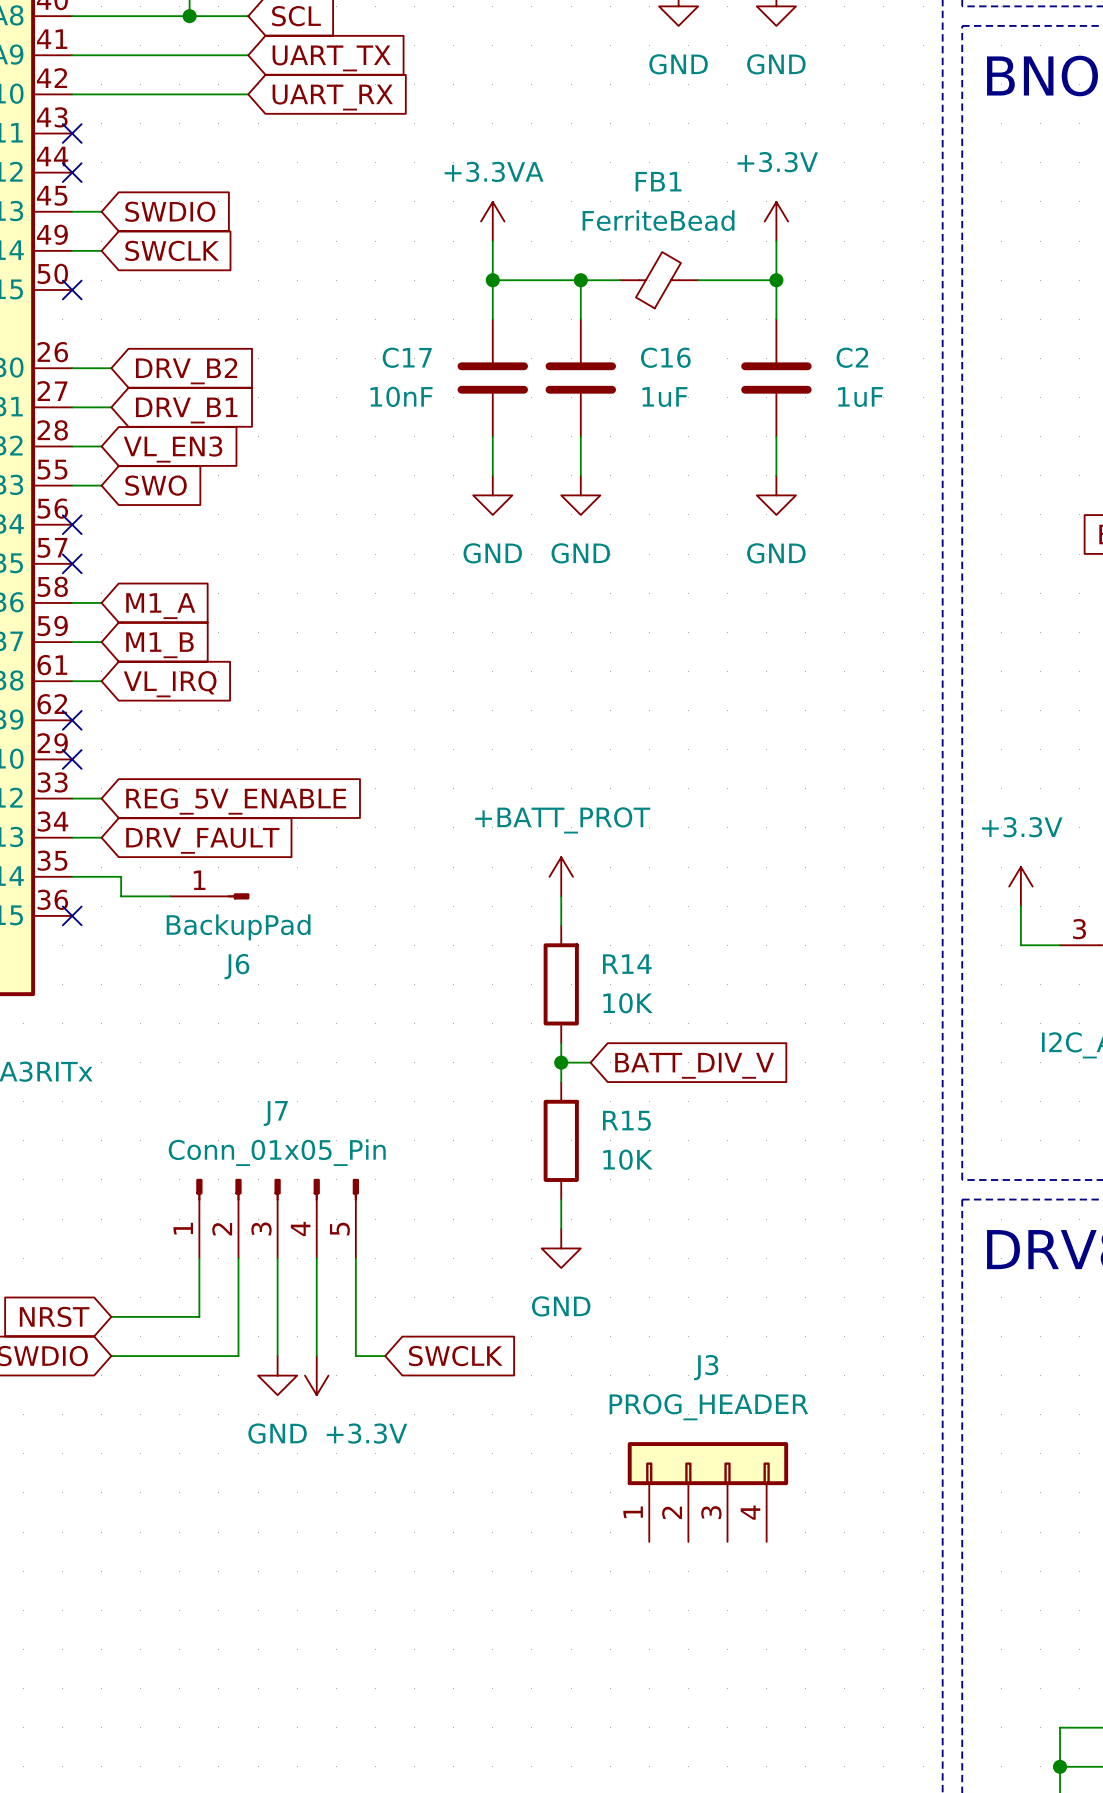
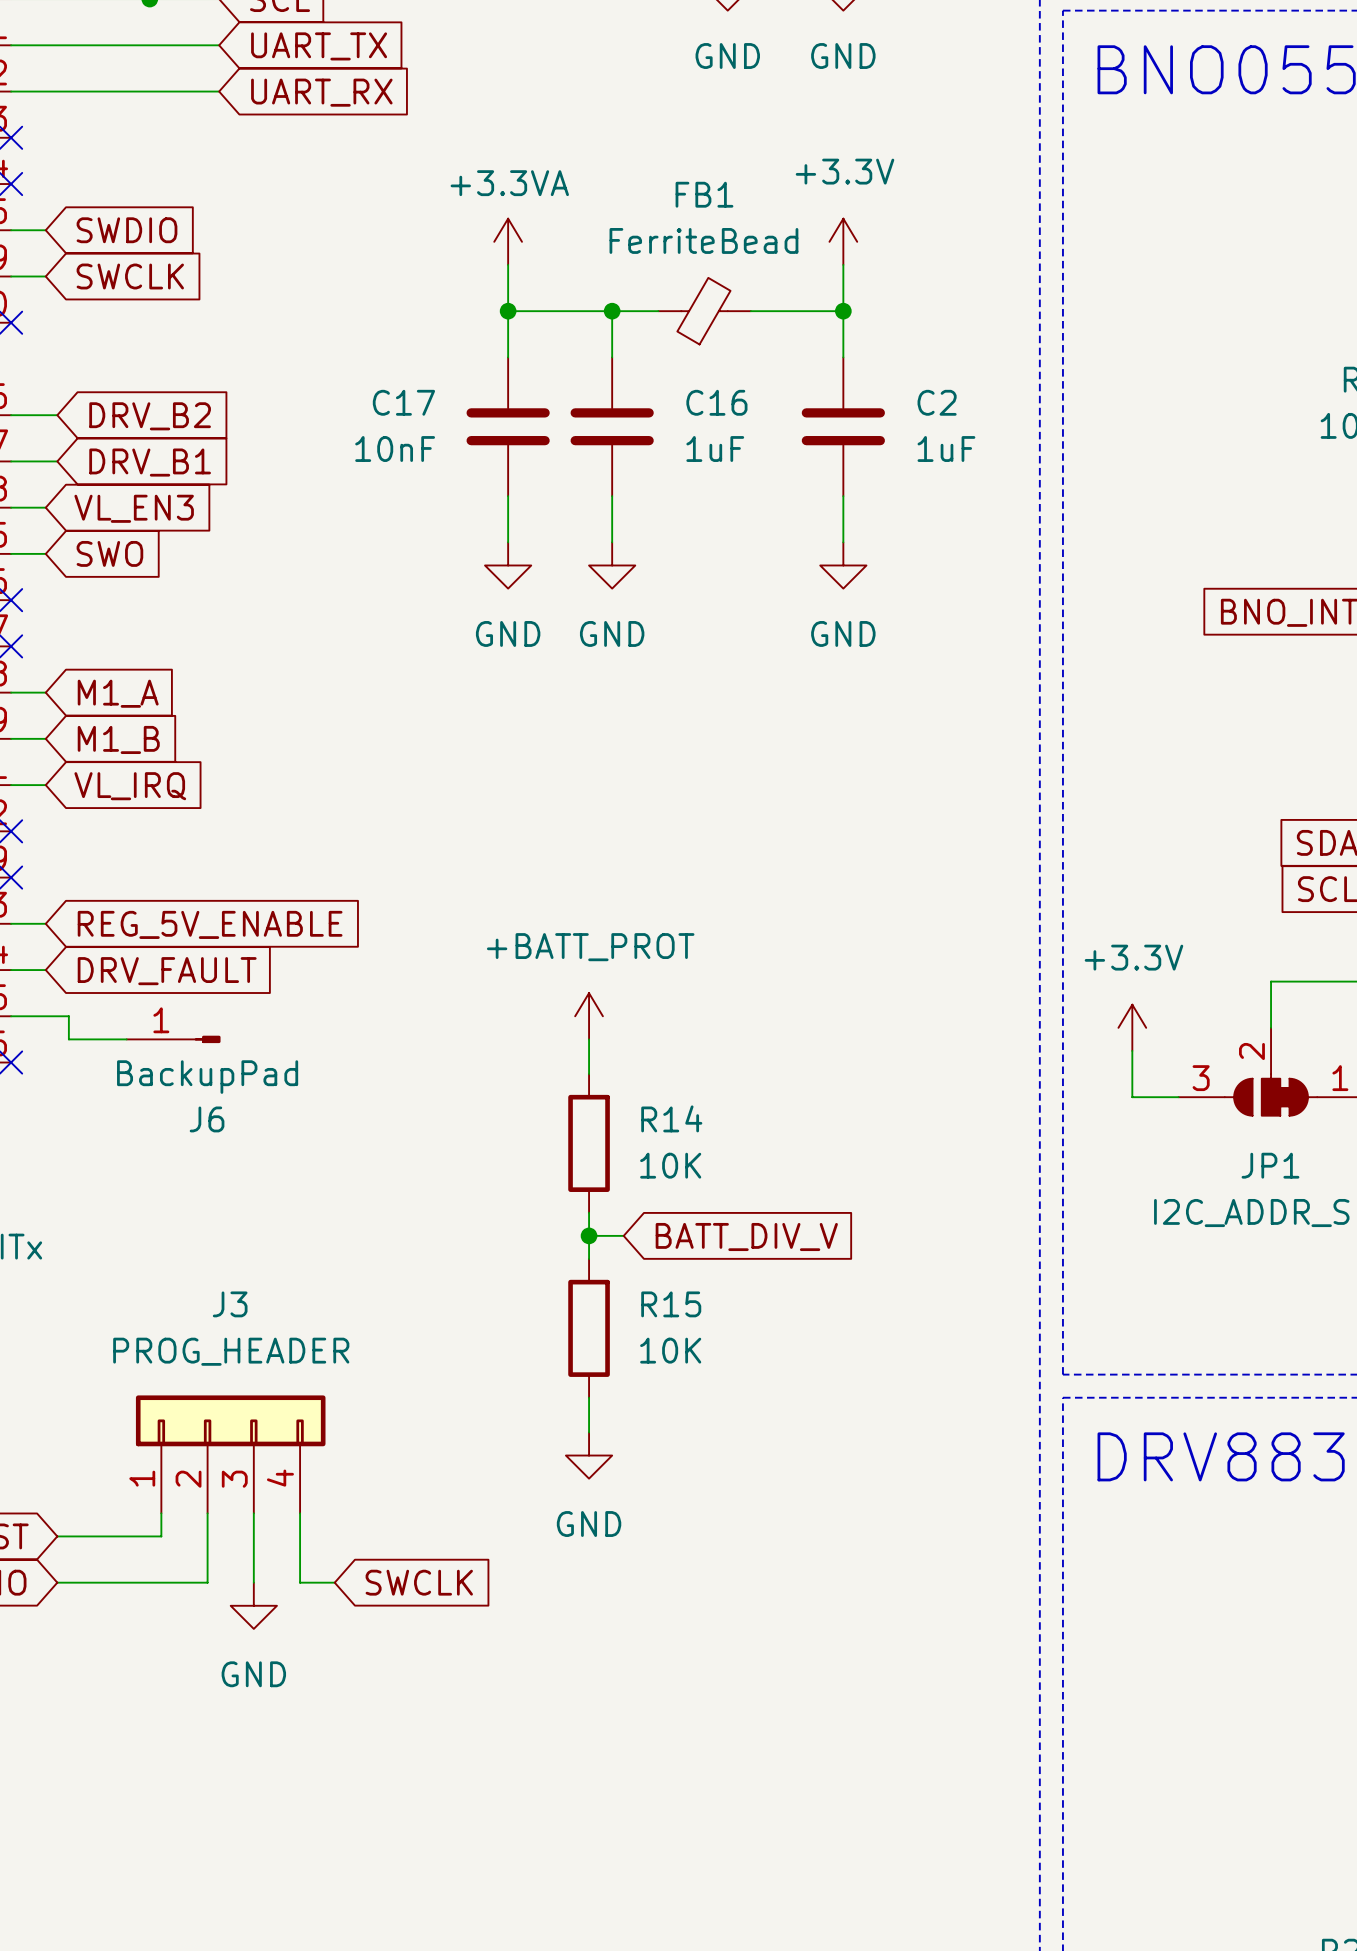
J7: Conn_01x05_Pin (277, 1218) -> none
wire: (355, 1258) (355, 1356) (385, 1356) -> none
wire: none -> (300, 1582) (334, 1582)
global label position: SWCLK (455, 1356) -> SWCLK (419, 1582)
power symbol: +3.3V (316, 1375) -> none
J3 position: (707, 1491) -> (230, 1454)

